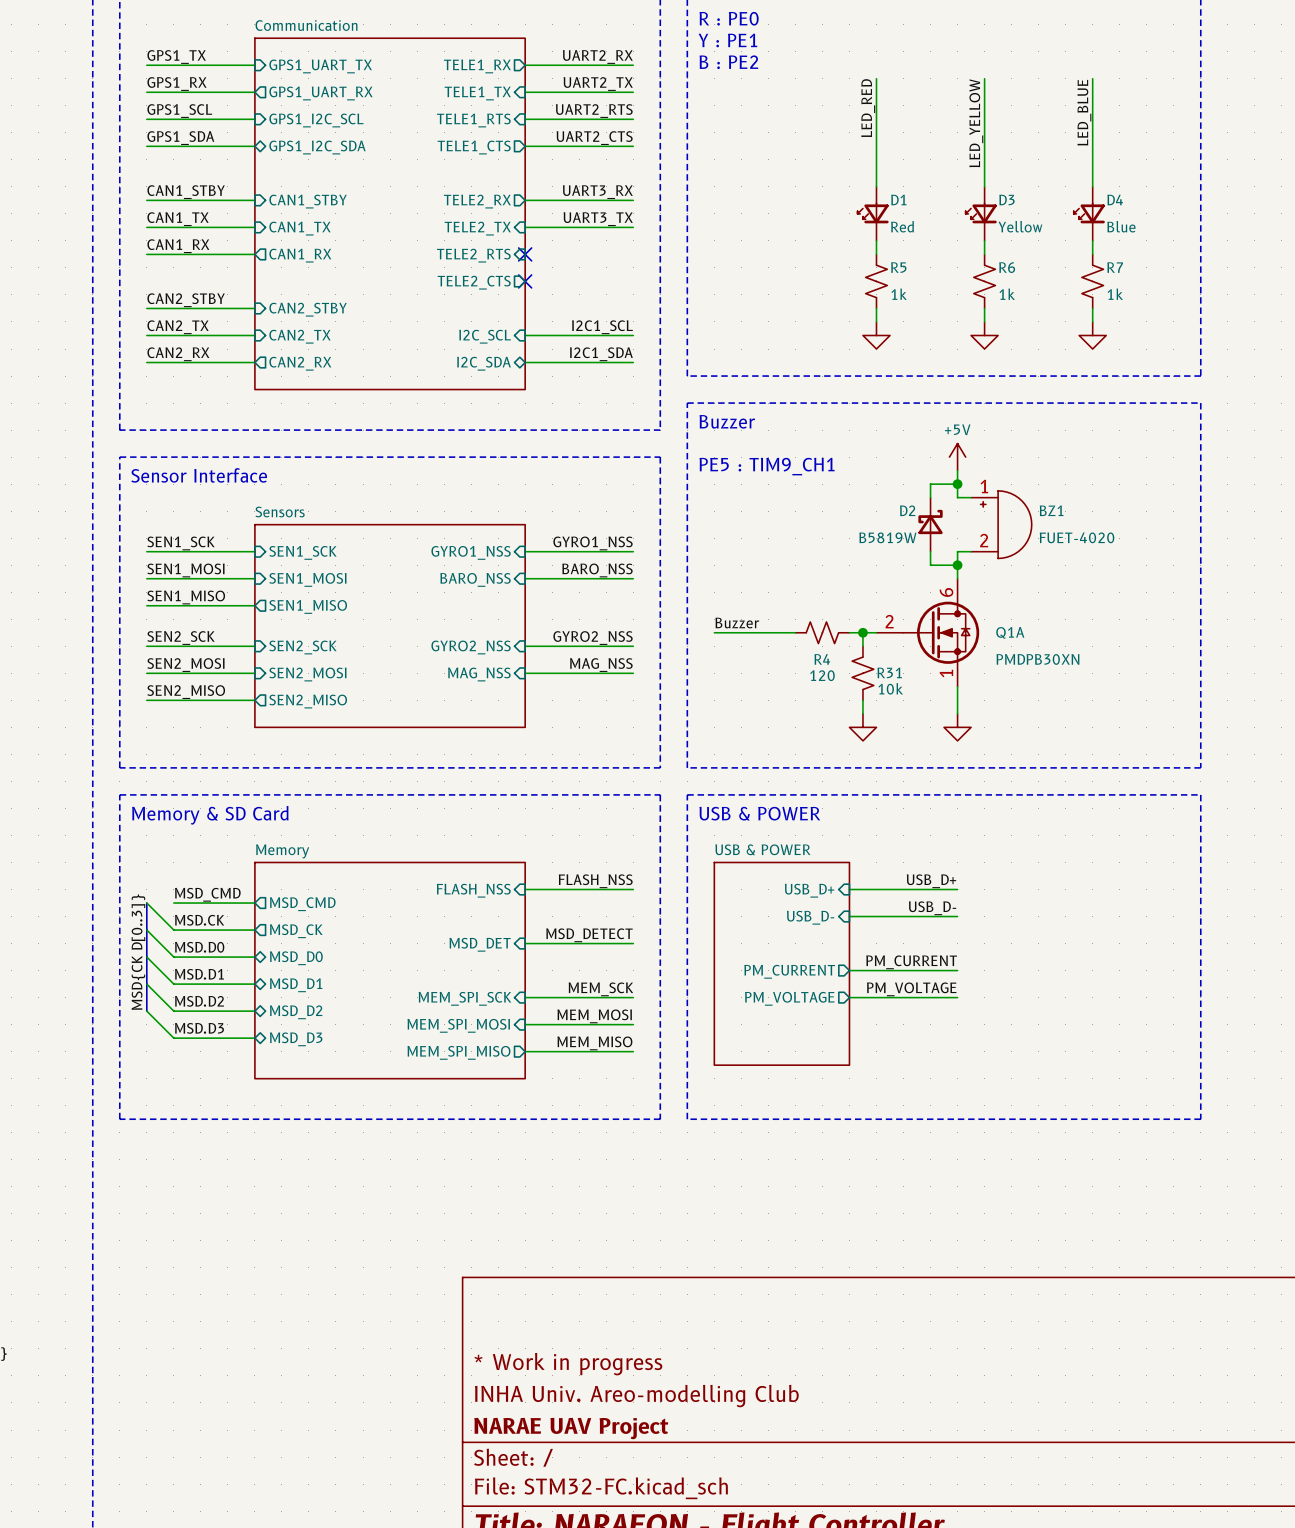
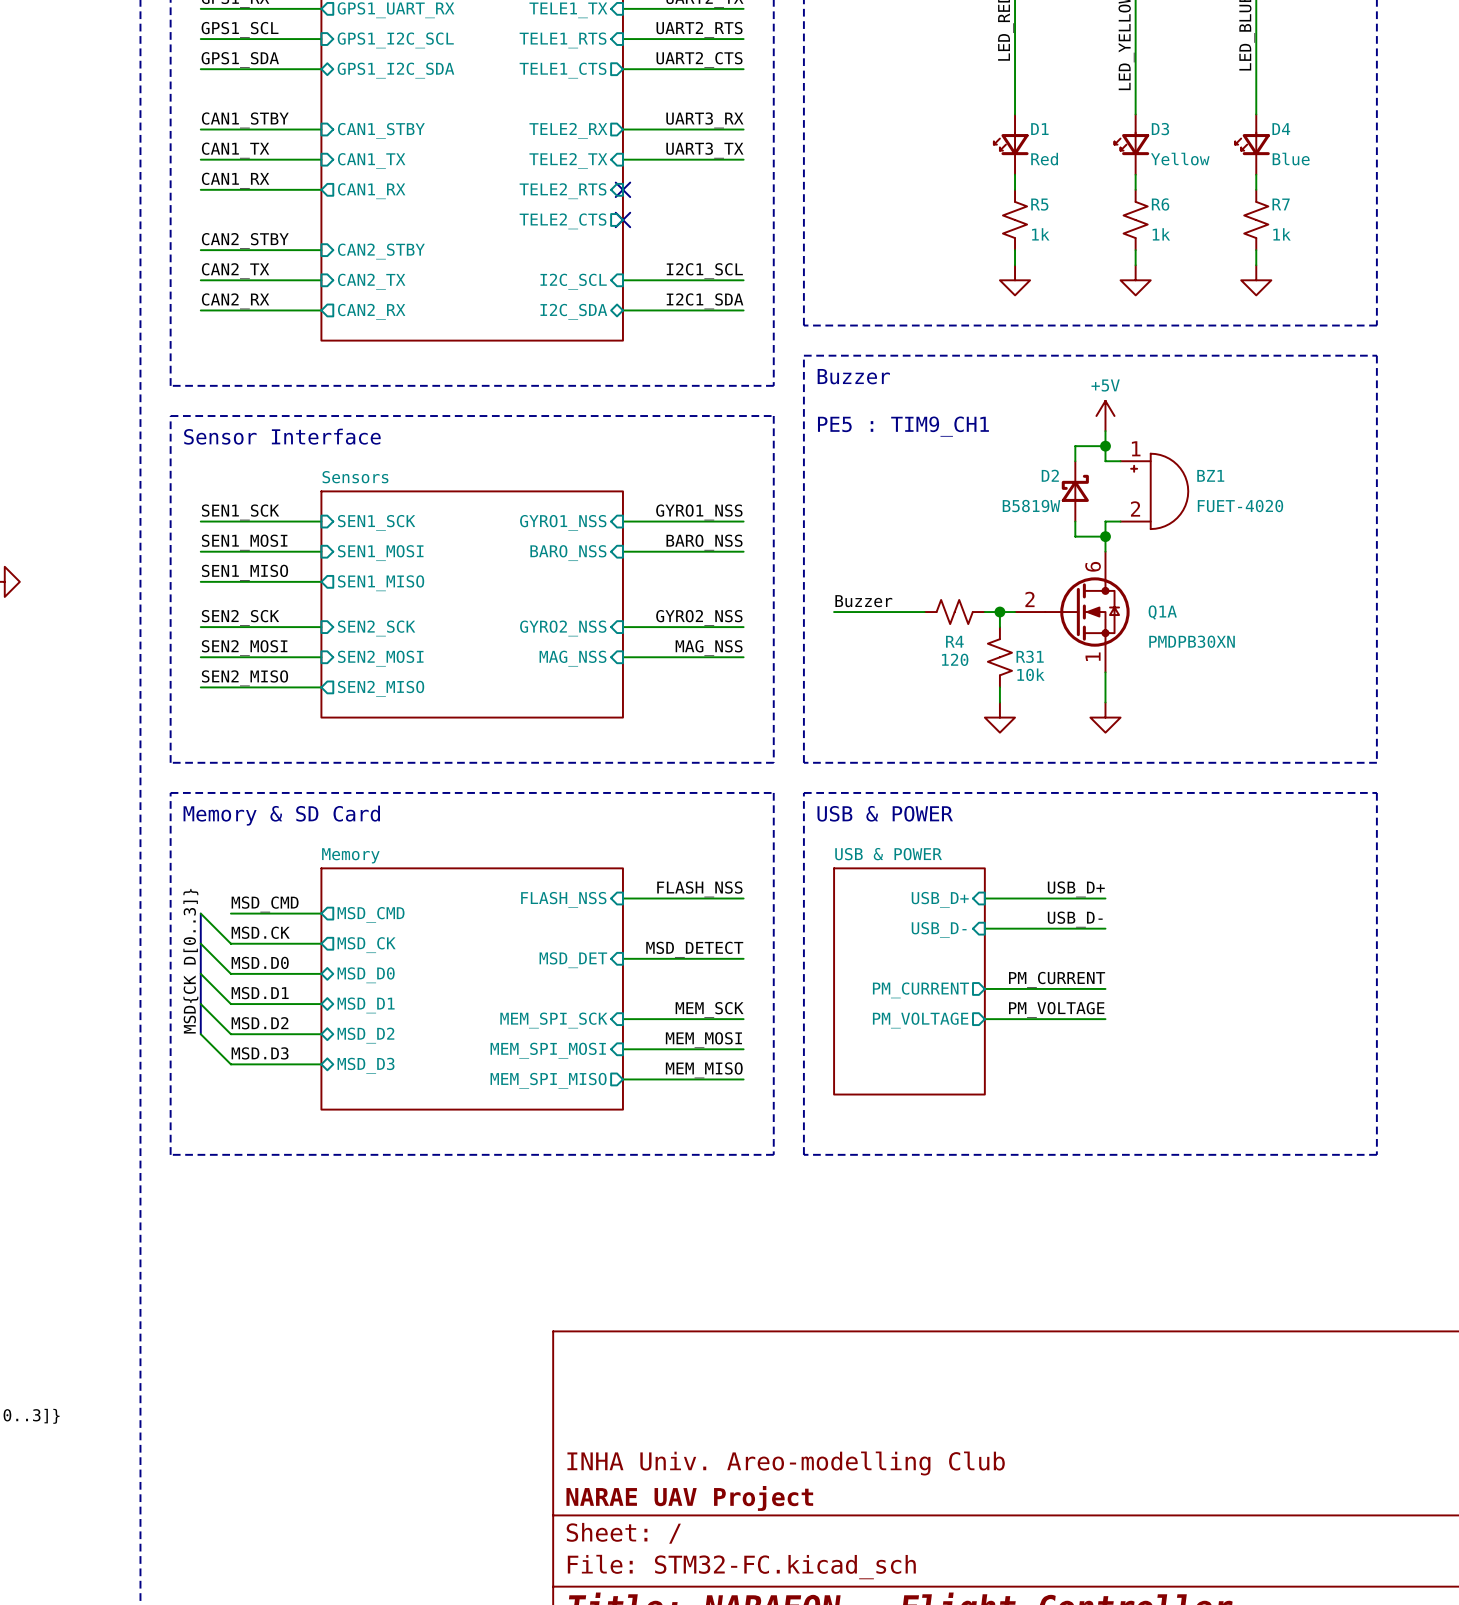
title block: * Work in progress (568, 1364) -> none

